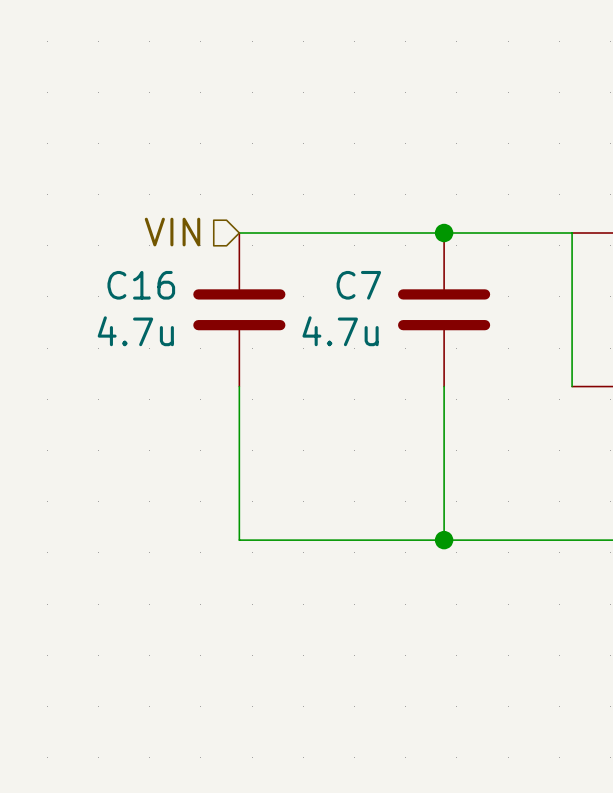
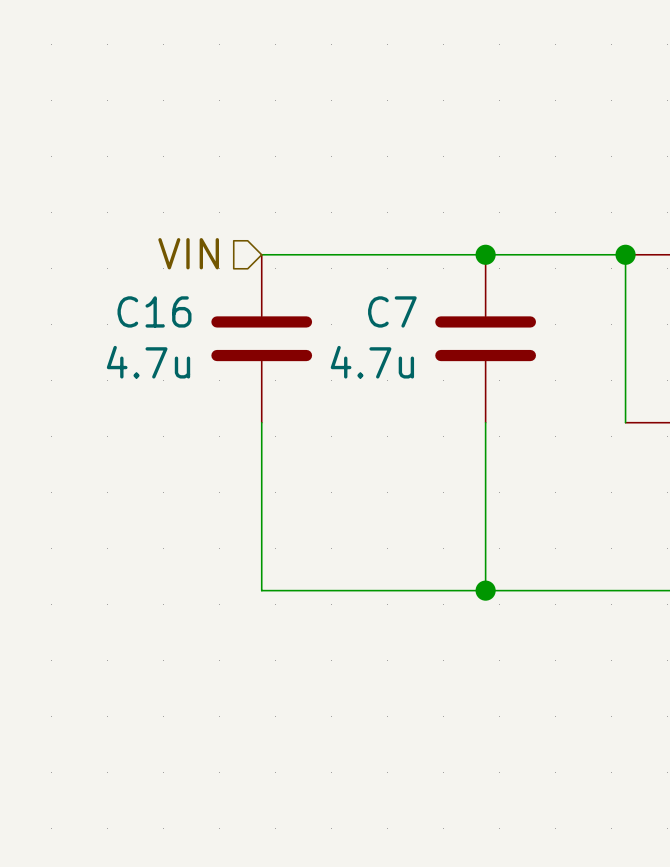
junction: none -> (625, 254)

